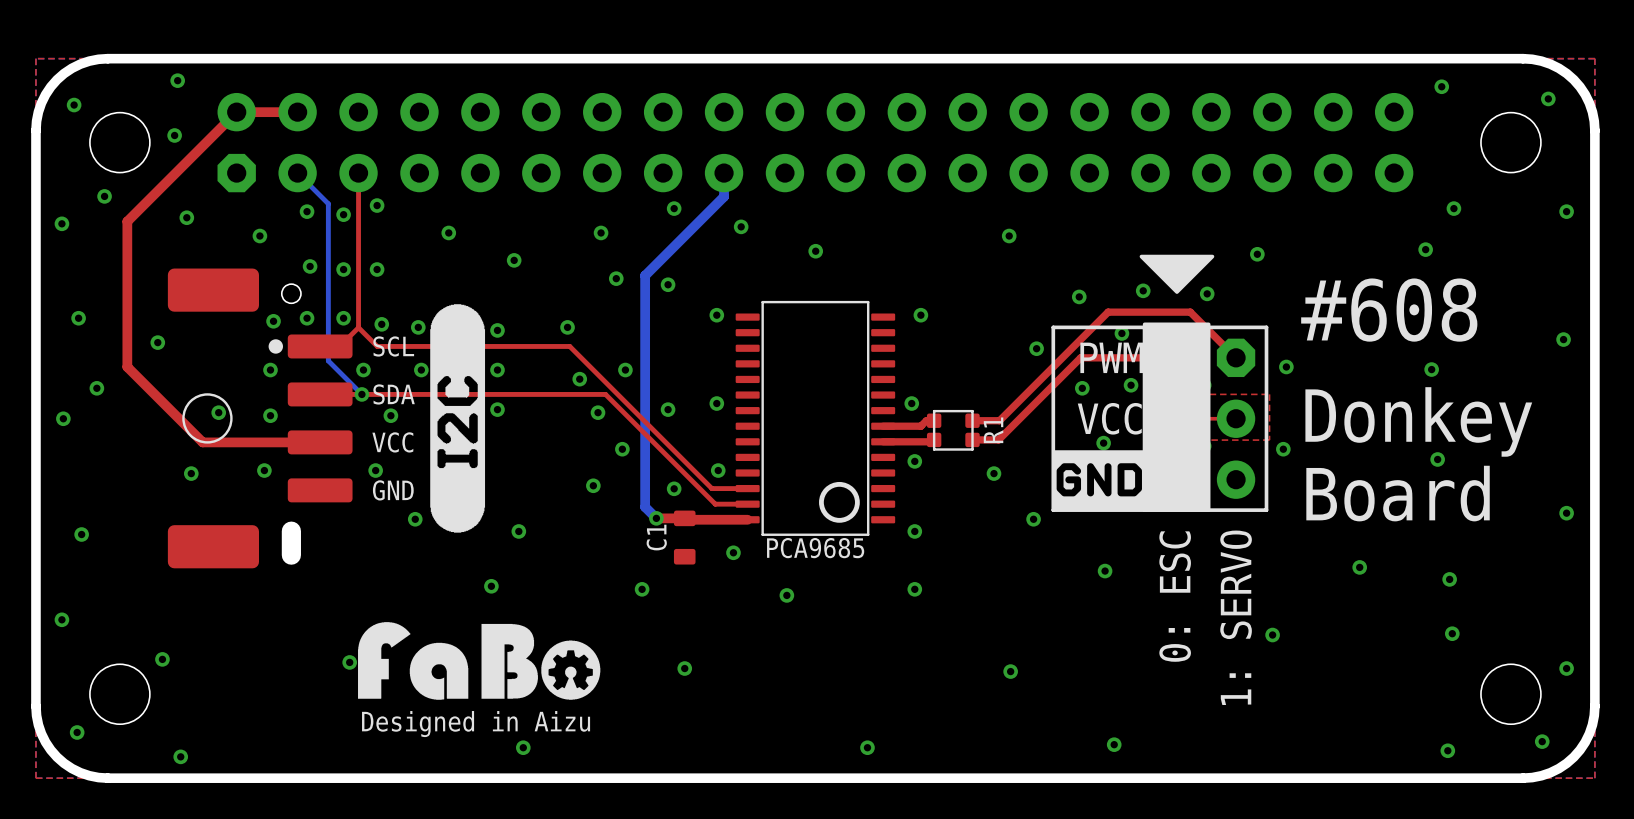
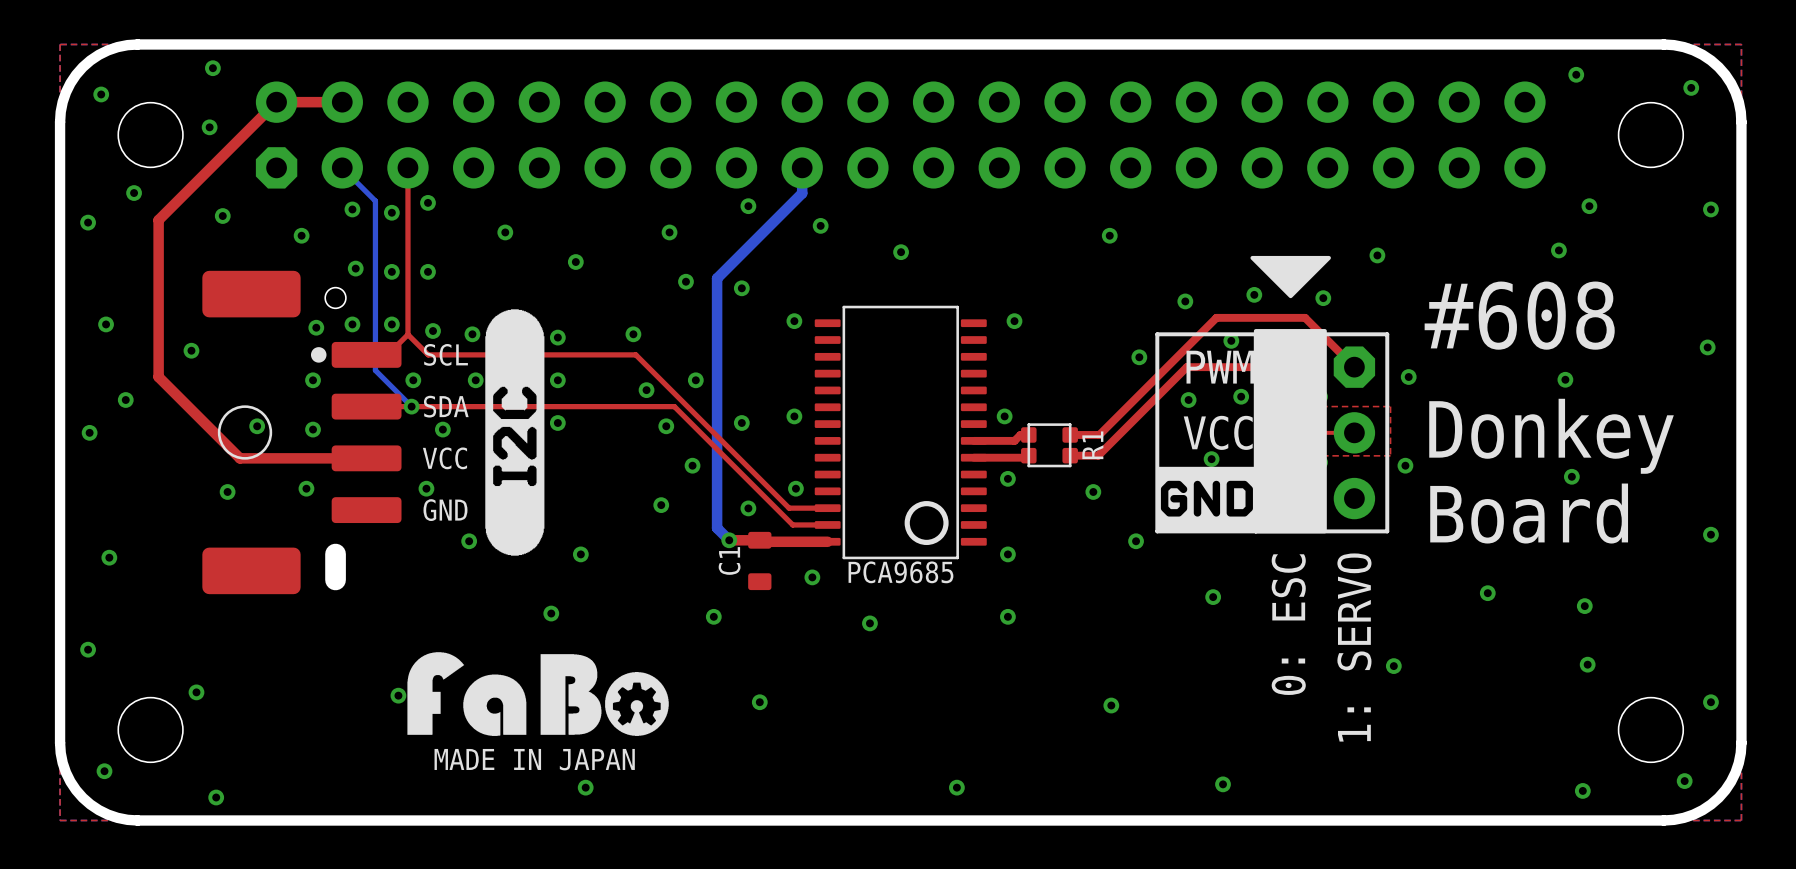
text: Designed in Aizu (476, 724) -> MADE IN JAPAN (534, 759)

